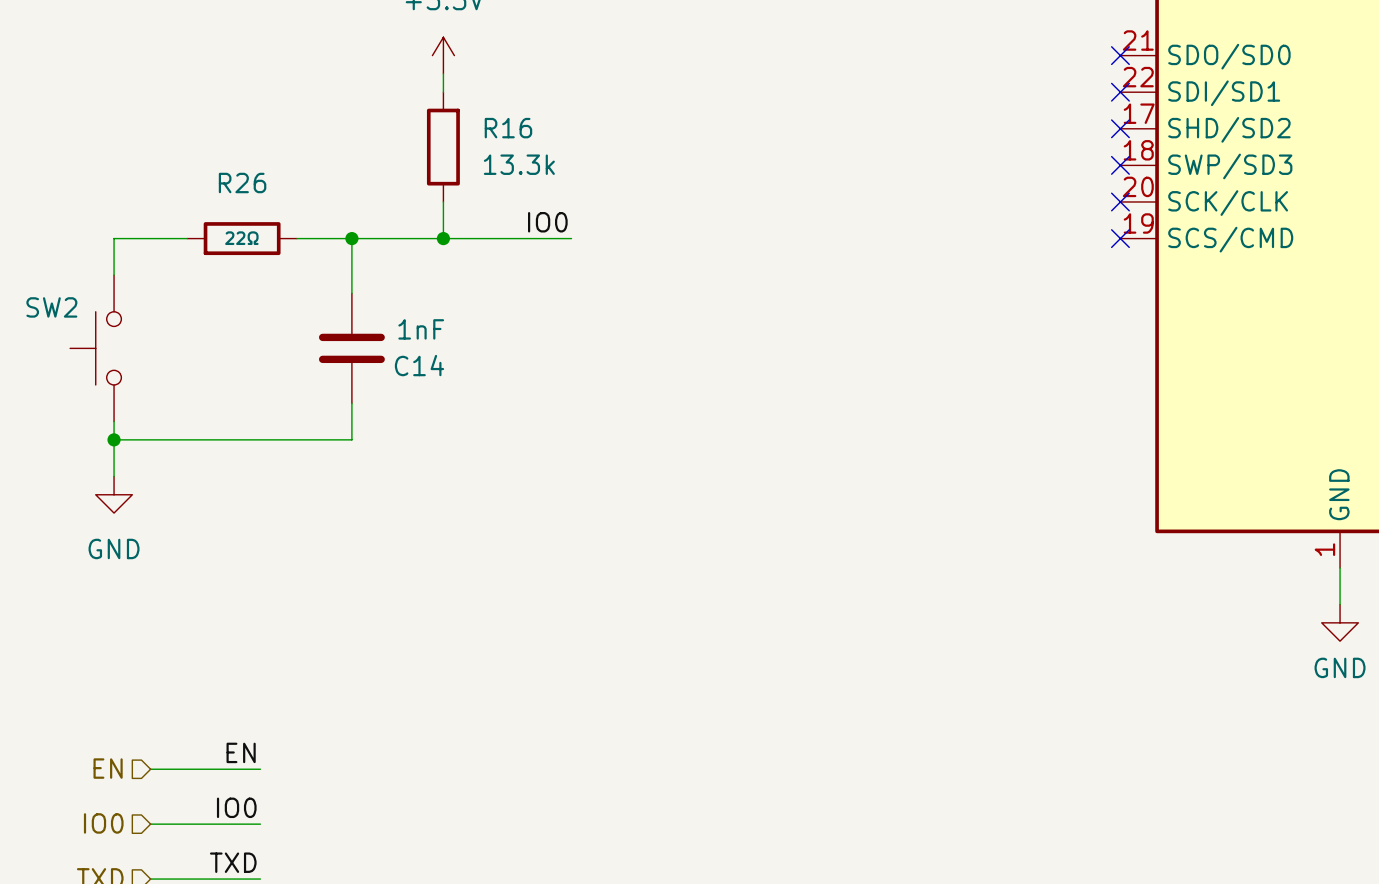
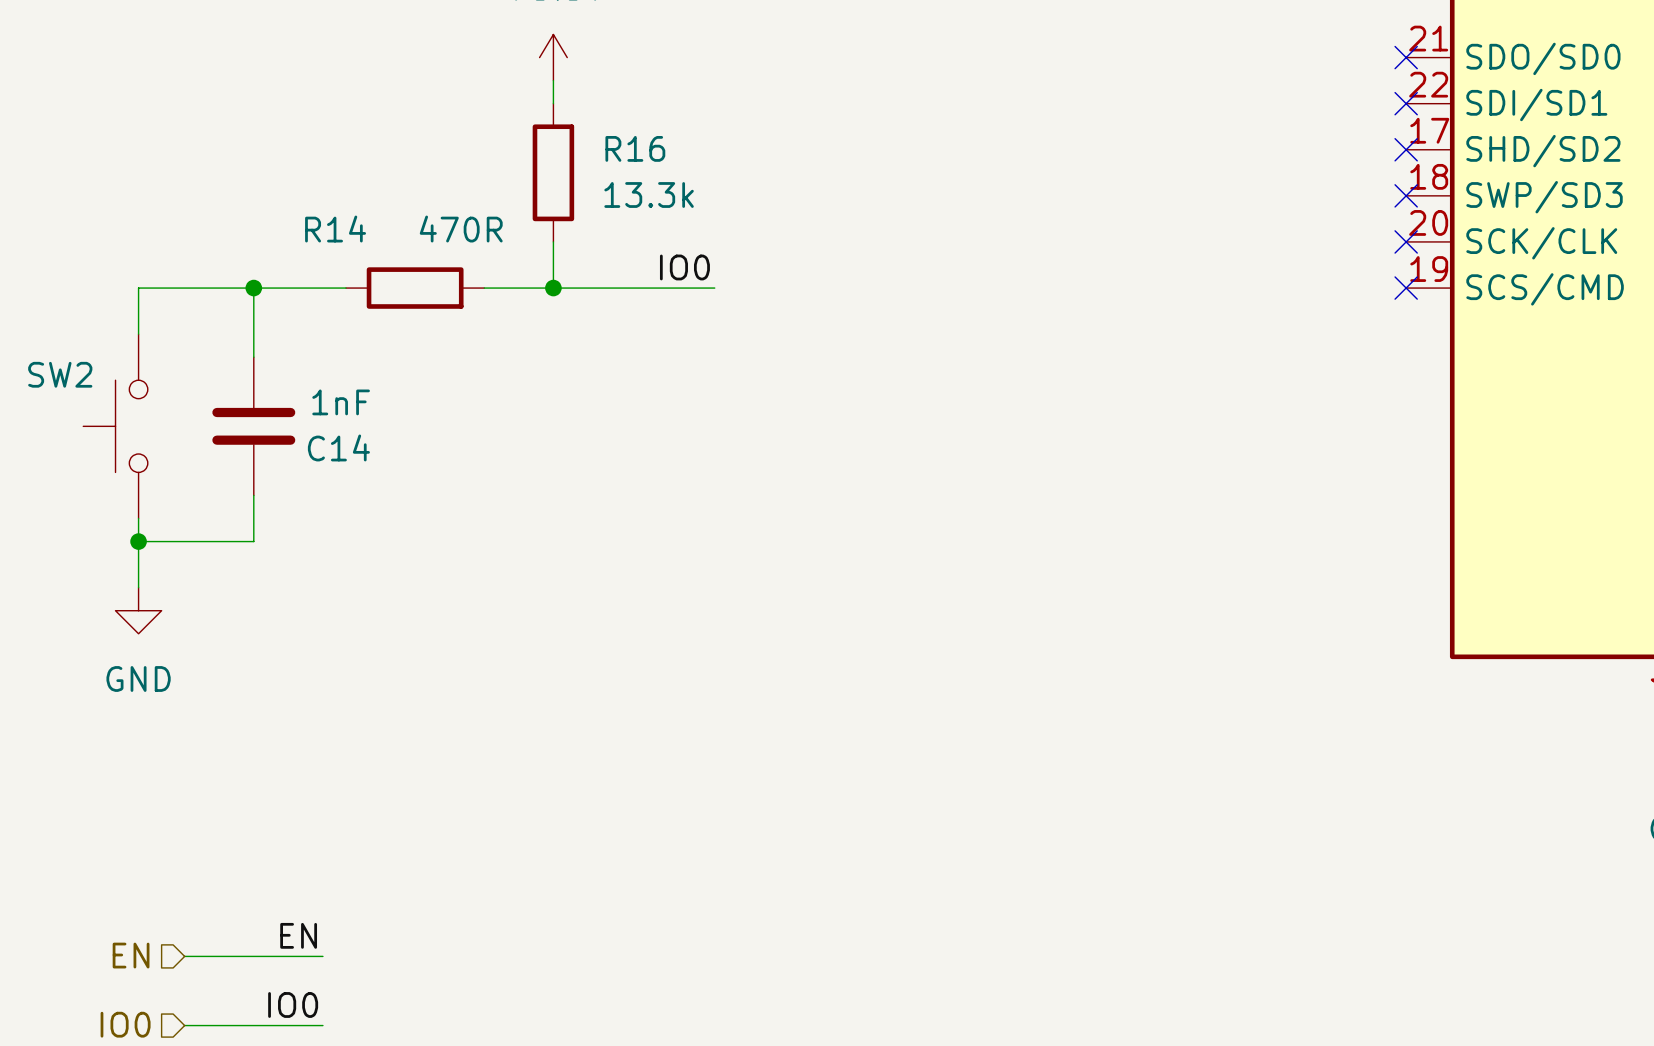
junction: none -> (253, 288)
R26: 22Ω (242, 238) -> none
wire: (297, 238) (388, 238) -> (230, 288) (345, 288)
R14: none -> 470R (415, 288)
wire: (351, 238) (351, 293) -> (253, 288) (253, 357)
junction: (351, 238) -> none
C14 position: (351, 348) -> (253, 426)
wire: (351, 403) (351, 439) (205, 439) -> (253, 495) (253, 541)

